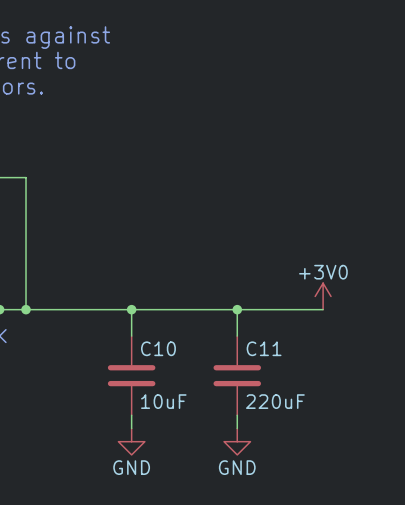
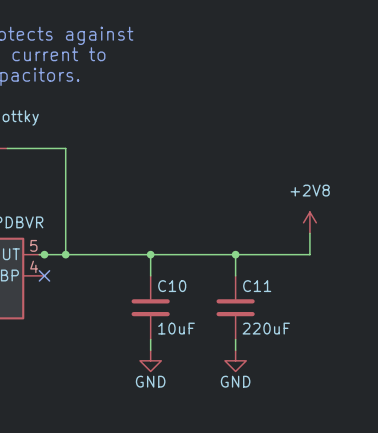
power symbol: none -> +2V8 (309, 222)
wire: none -> (309, 233) (309, 254) (304, 254)
power symbol: +3V0 (323, 296) -> none

